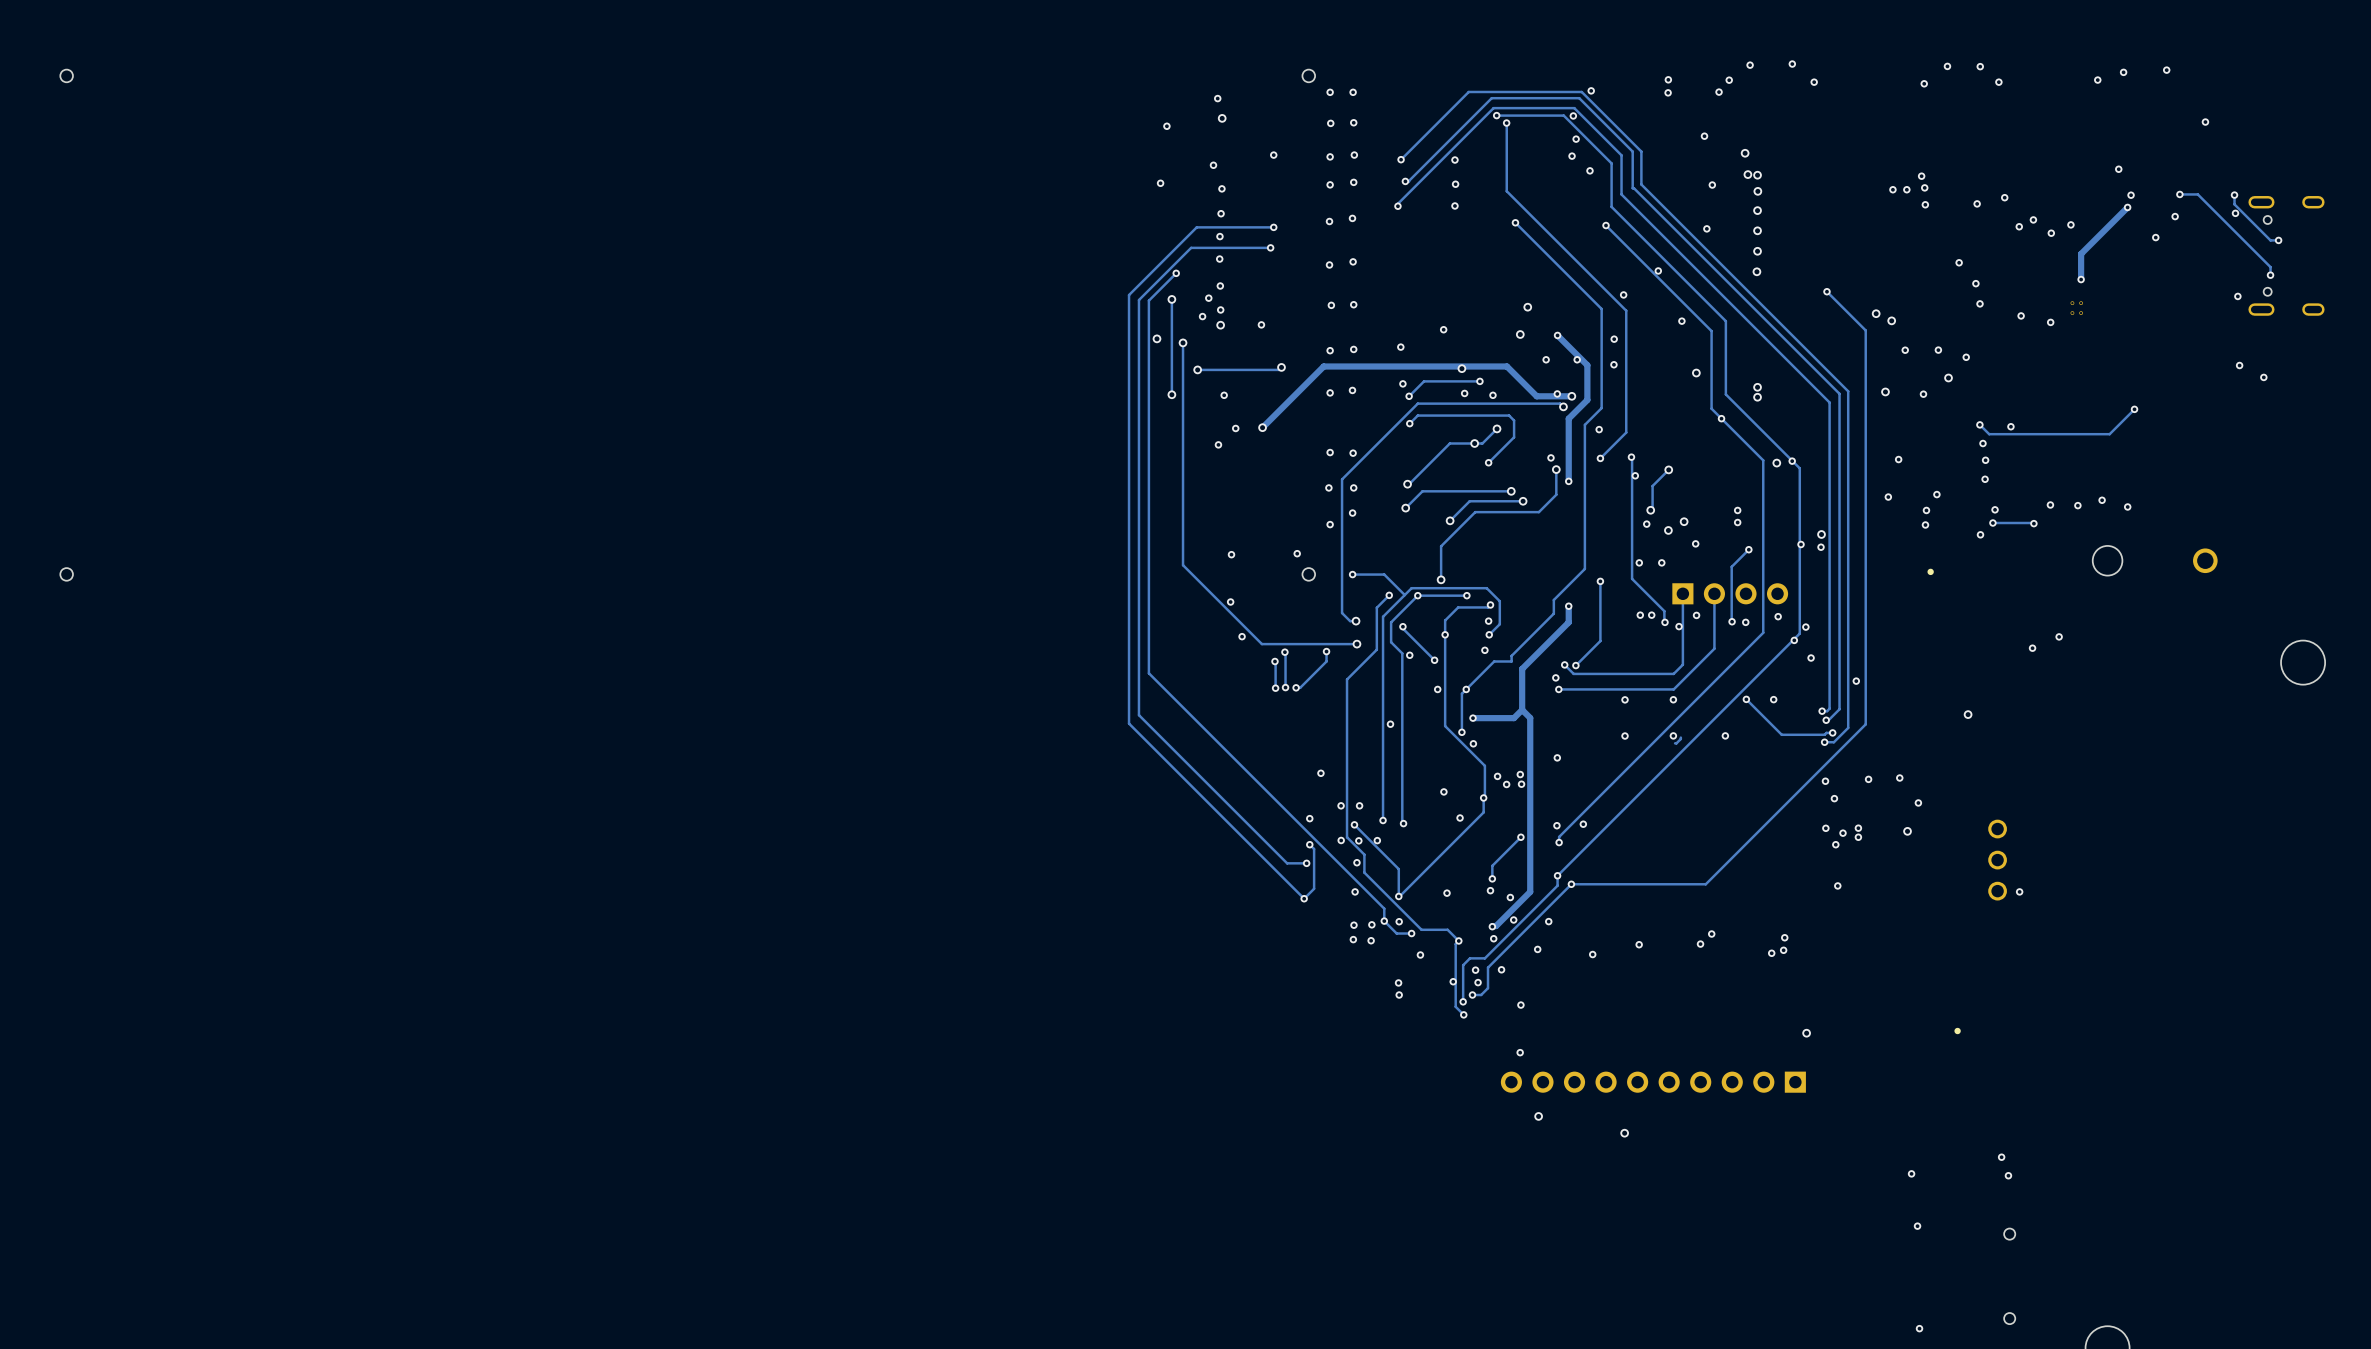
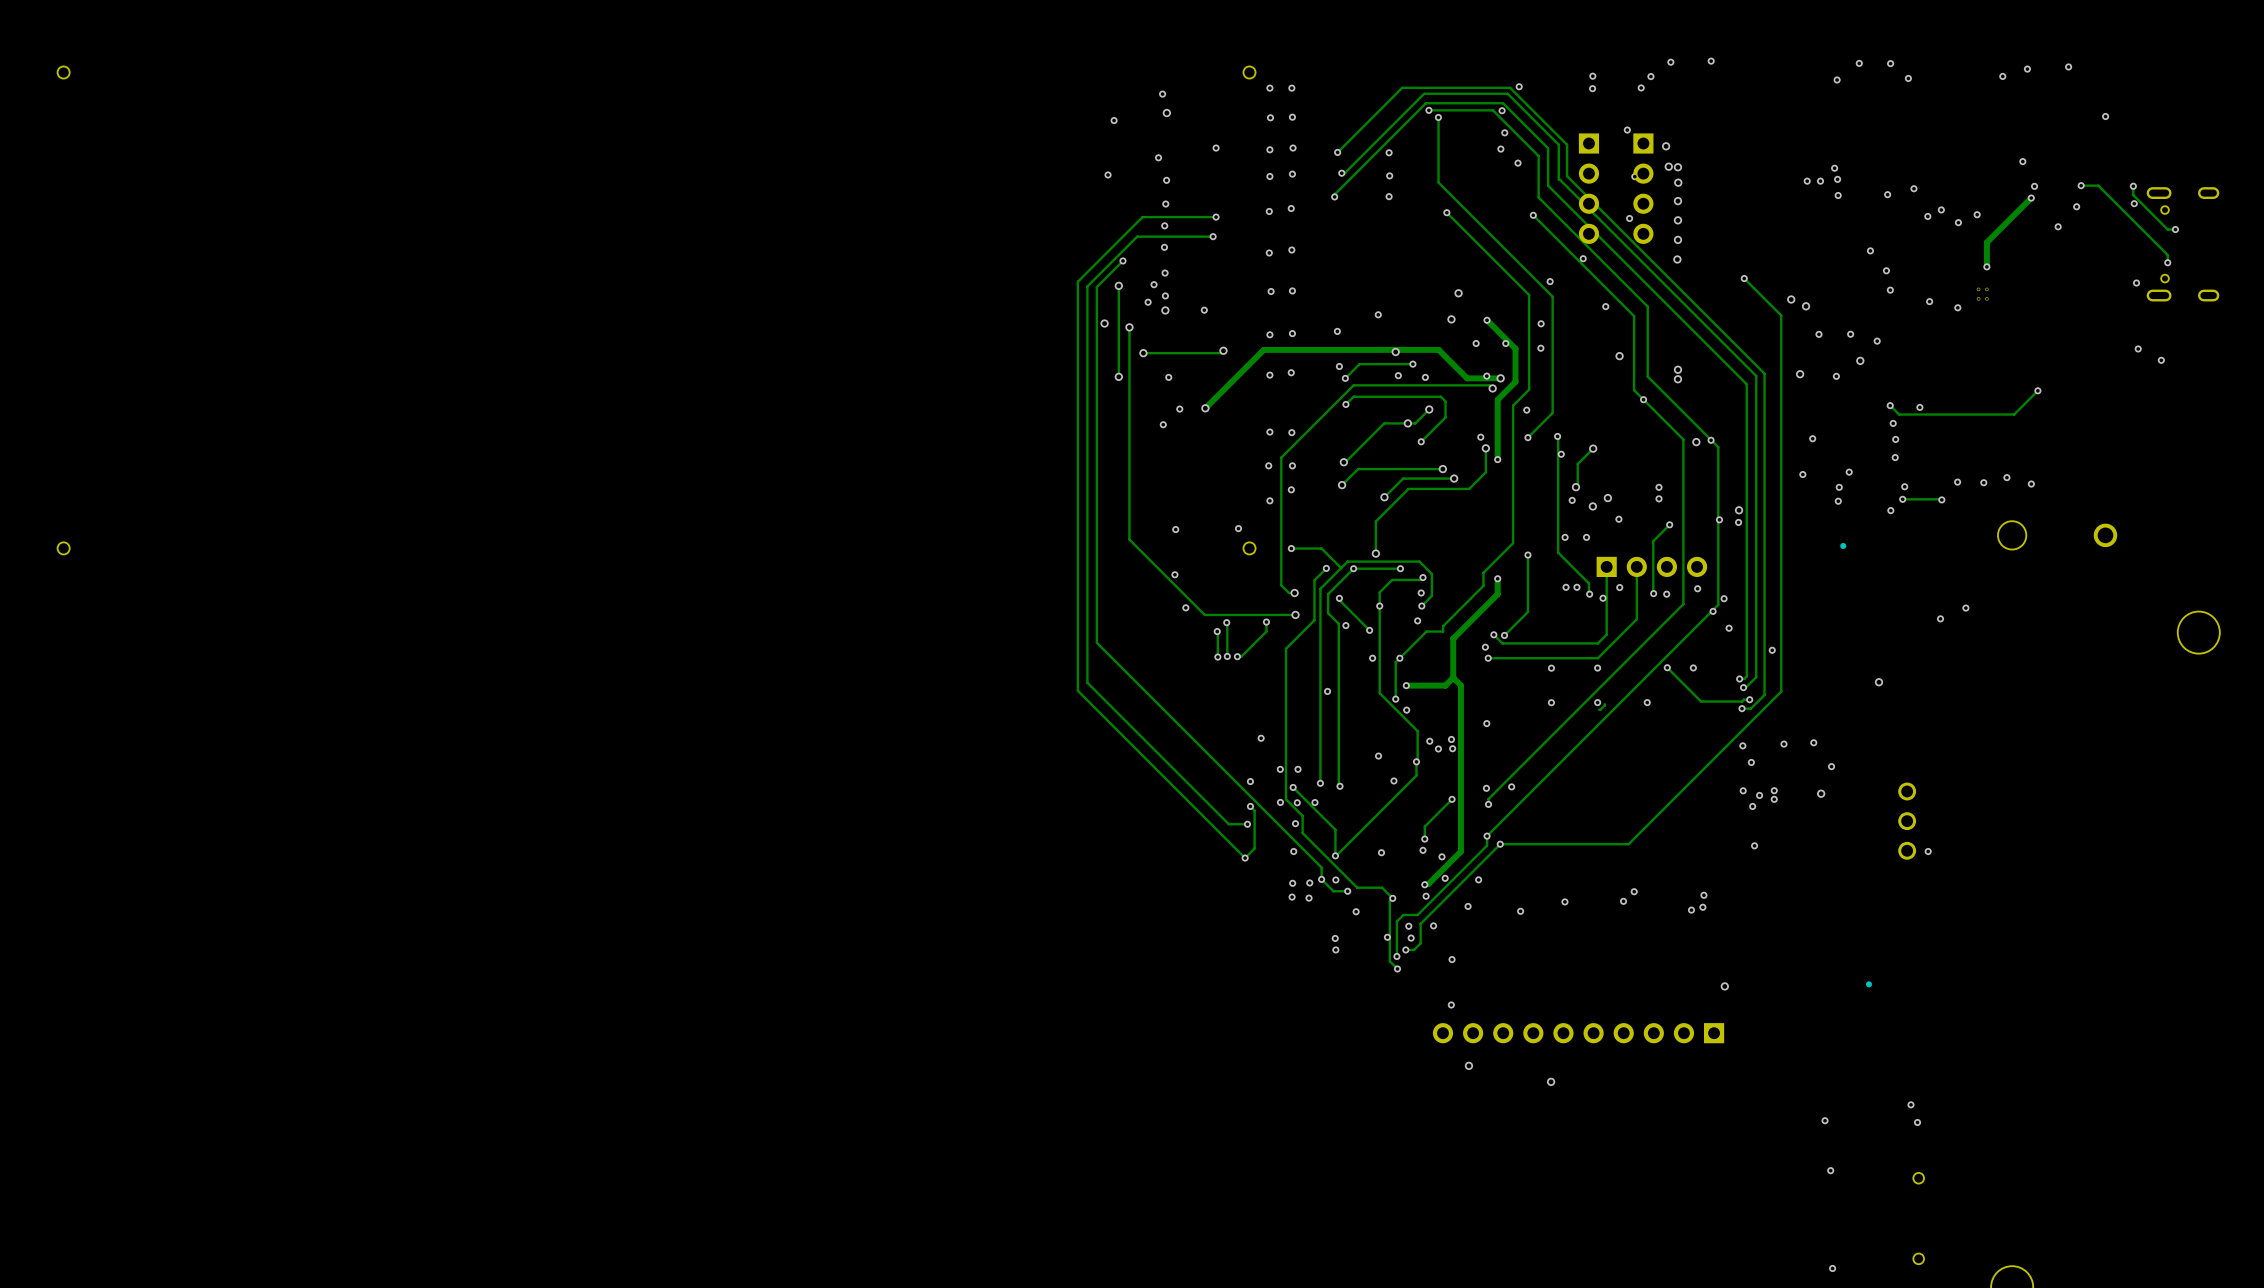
via: (1814, 82) -> none
part: none -> (1588, 188)
part: none -> (1643, 188)

